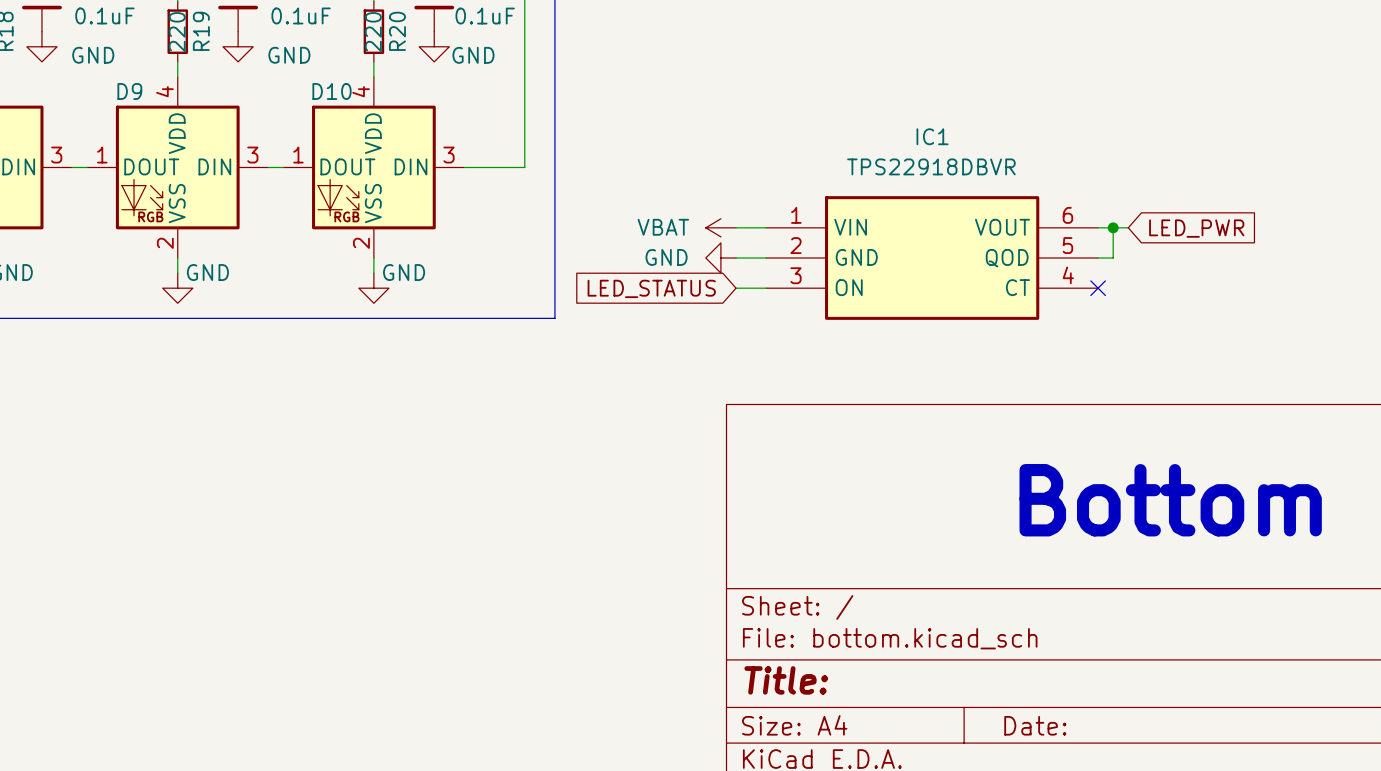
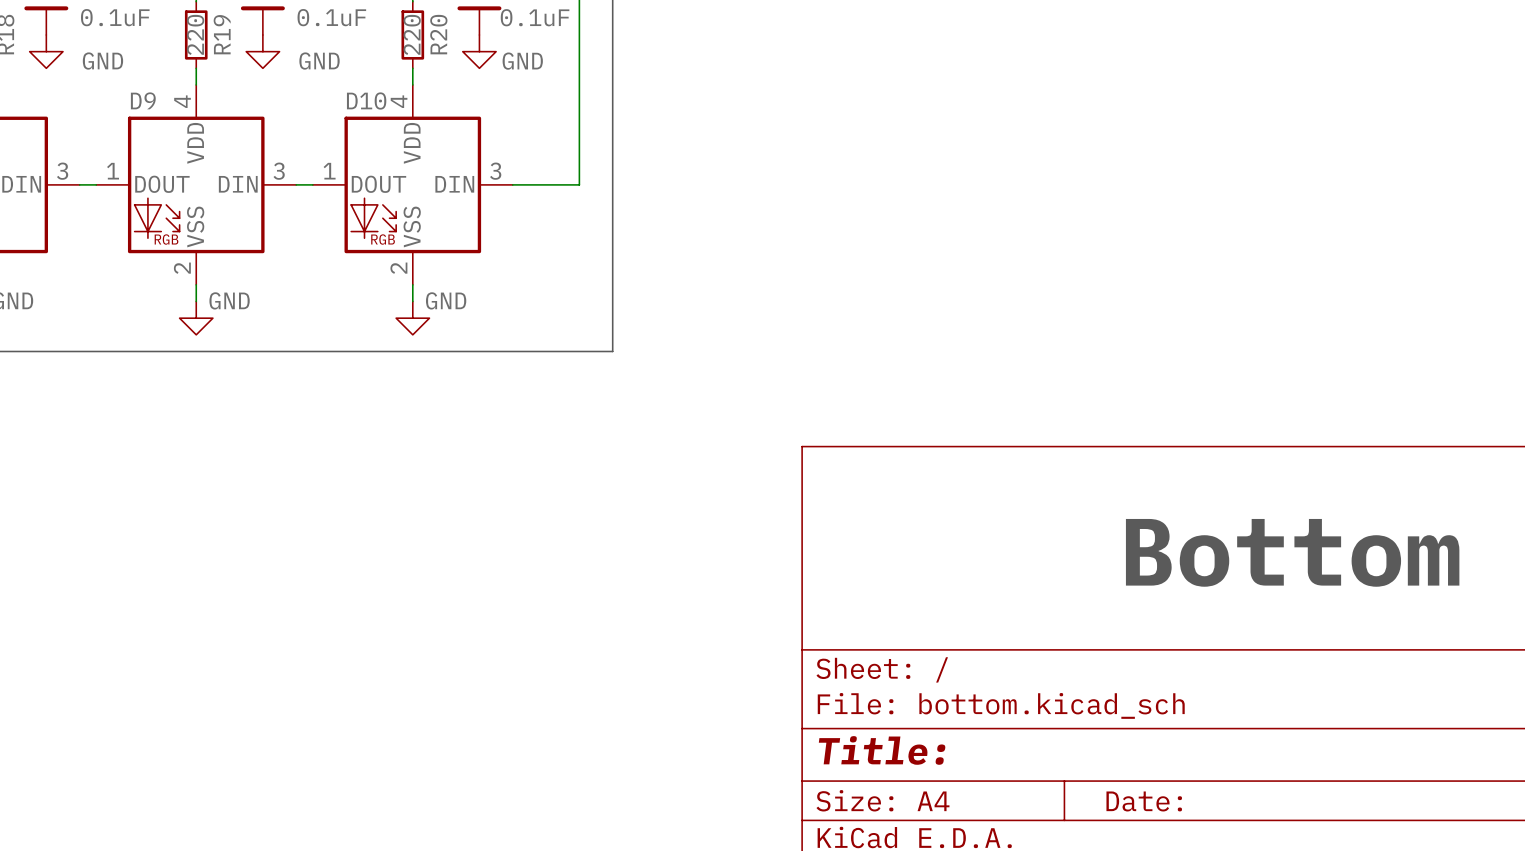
power symbol: VBAT (720, 227) -> none
wire: (736, 227) (766, 227) -> none
wire: (1098, 227) (1128, 227) -> none
wire: (1113, 227) (1113, 258) (1098, 258) -> none
junction: (1113, 227) -> none
global label: LED_PWR (1196, 228) -> none
power symbol: GND (720, 258) -> none
wire: (736, 258) (766, 258) -> none
IC1: TPS22918DBVR (932, 258) -> none
global label: LED_STATUS (651, 288) -> none
wire: (736, 288) (766, 288) -> none
no-connect mark: (1098, 288) -> none

